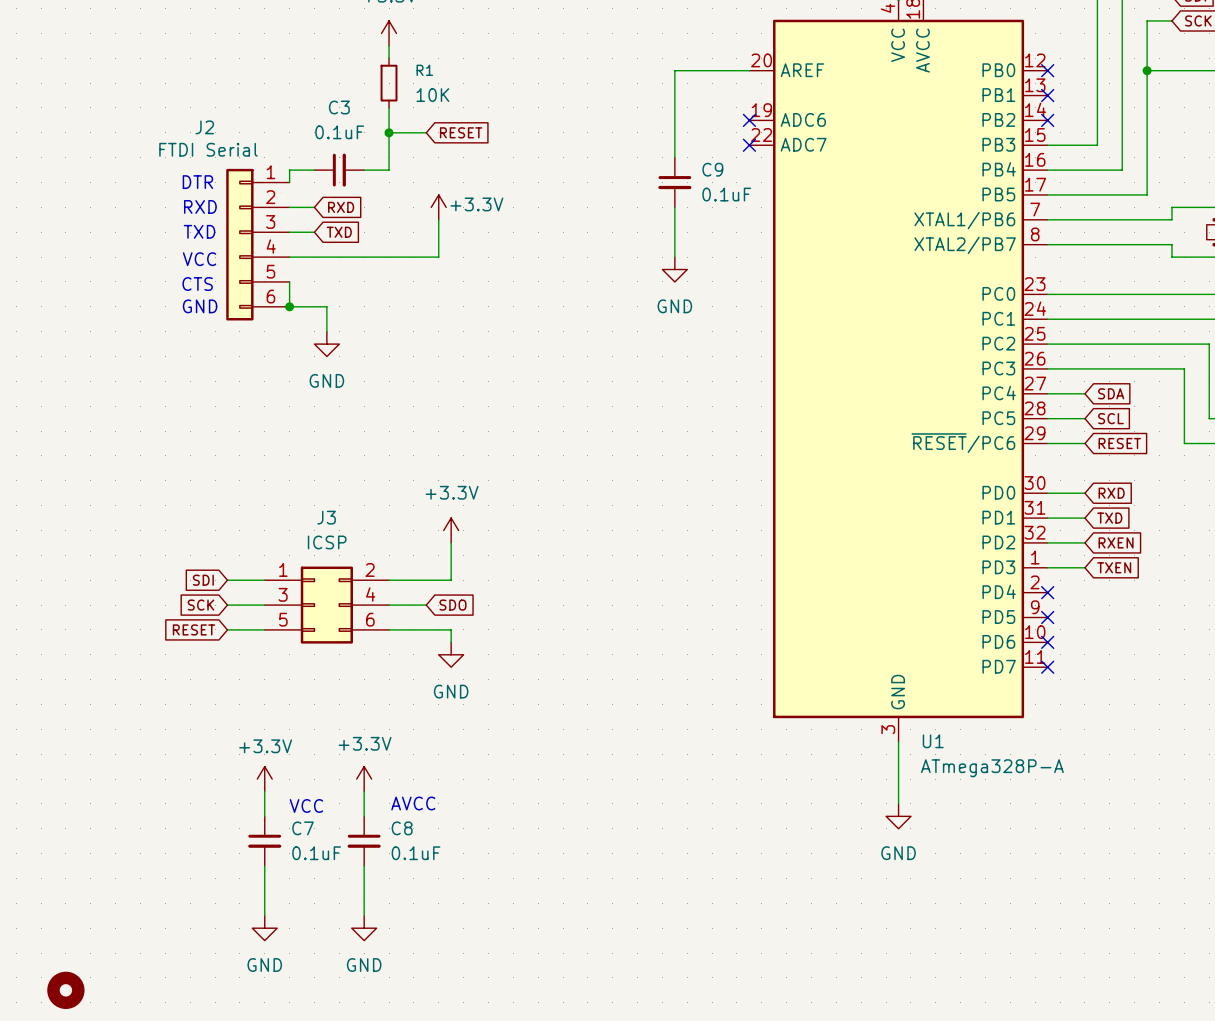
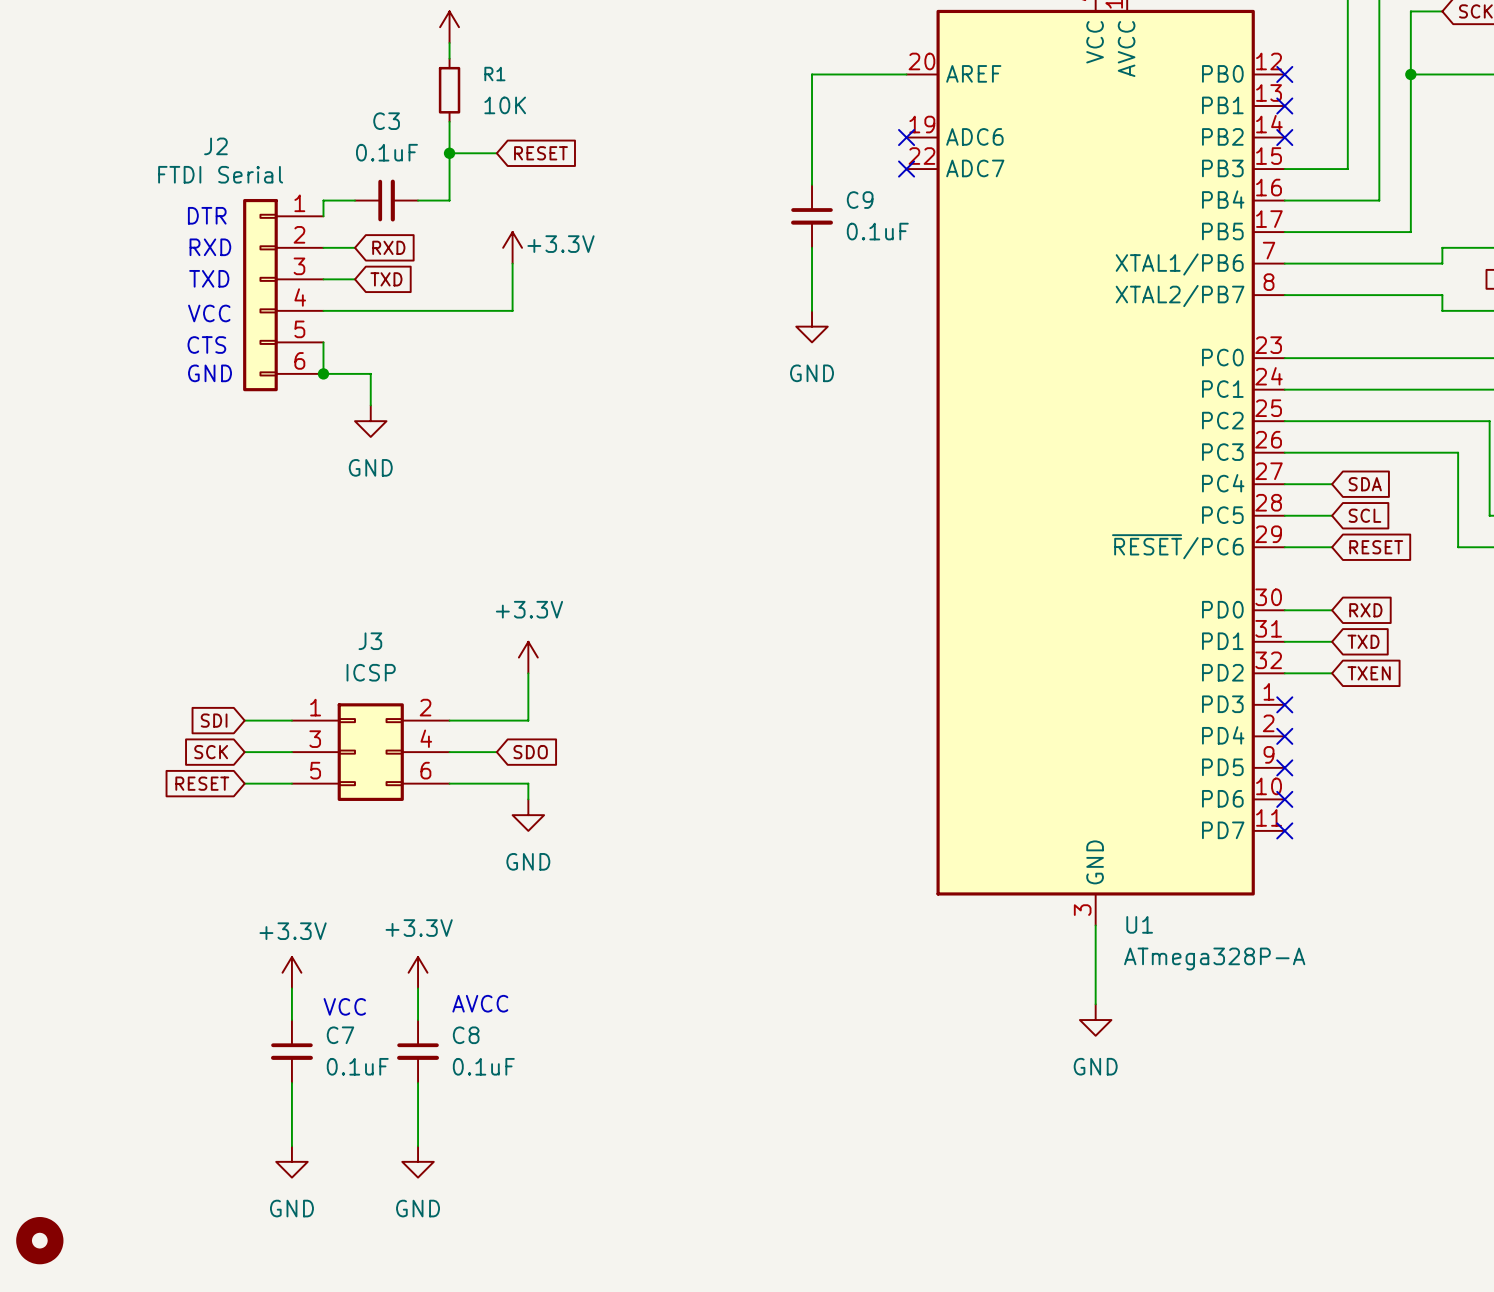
global label: RXEN (1116, 542) -> TXEN (1369, 673)
wire: (1047, 567) (1084, 567) -> none
no-connect mark: none -> (1284, 704)
global label: TXEN (1114, 567) -> none

